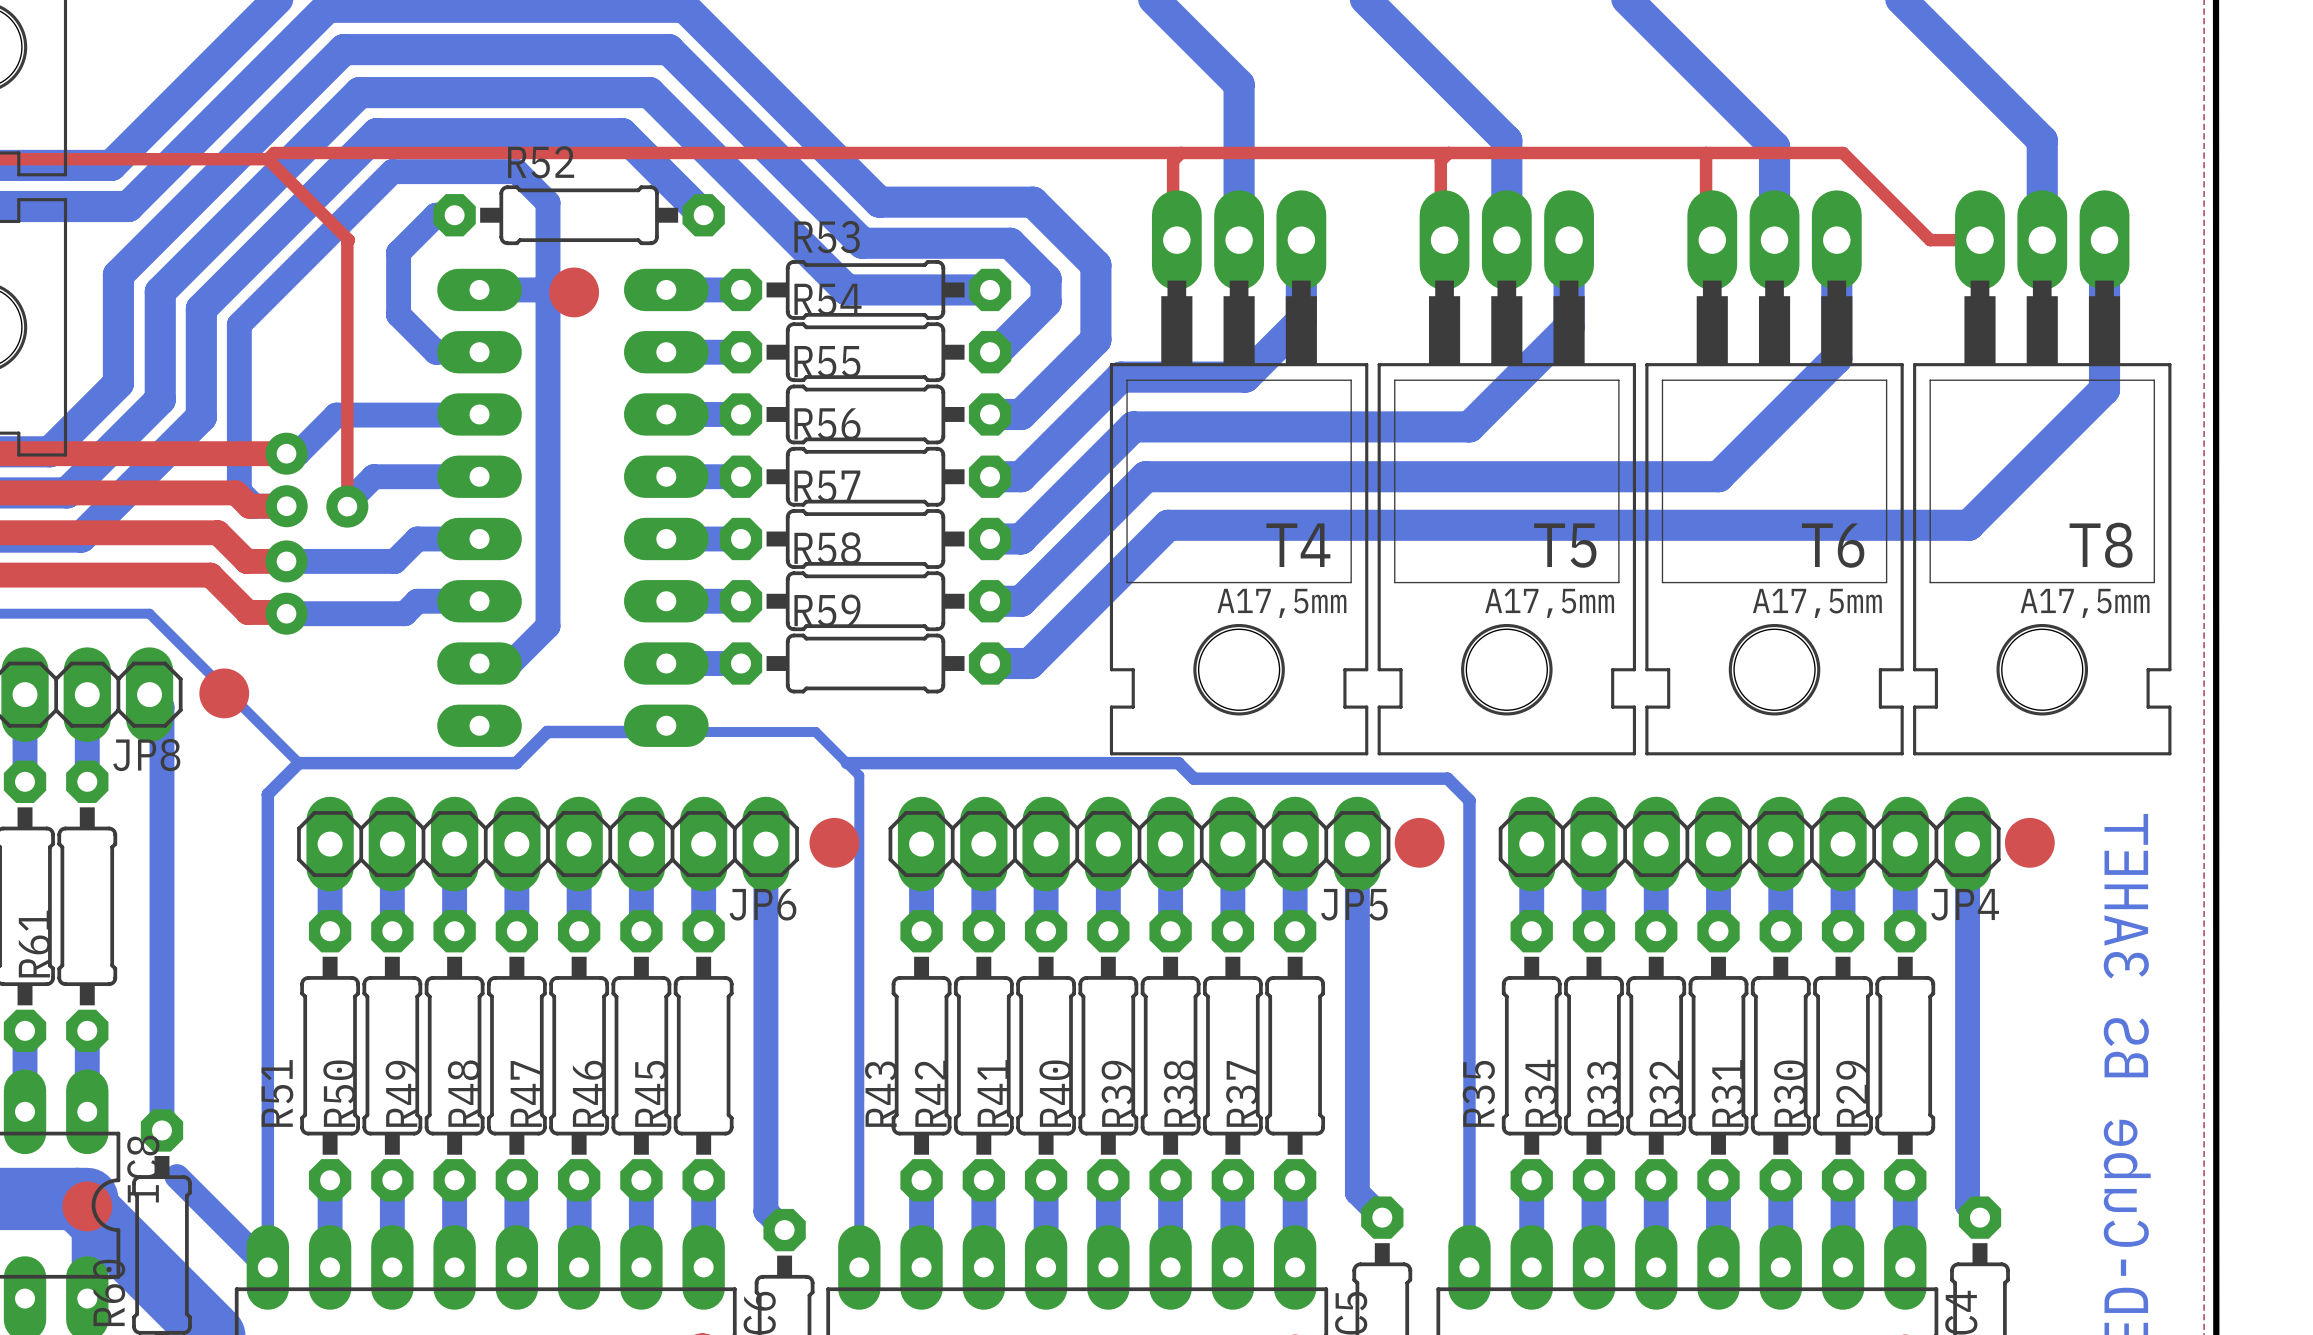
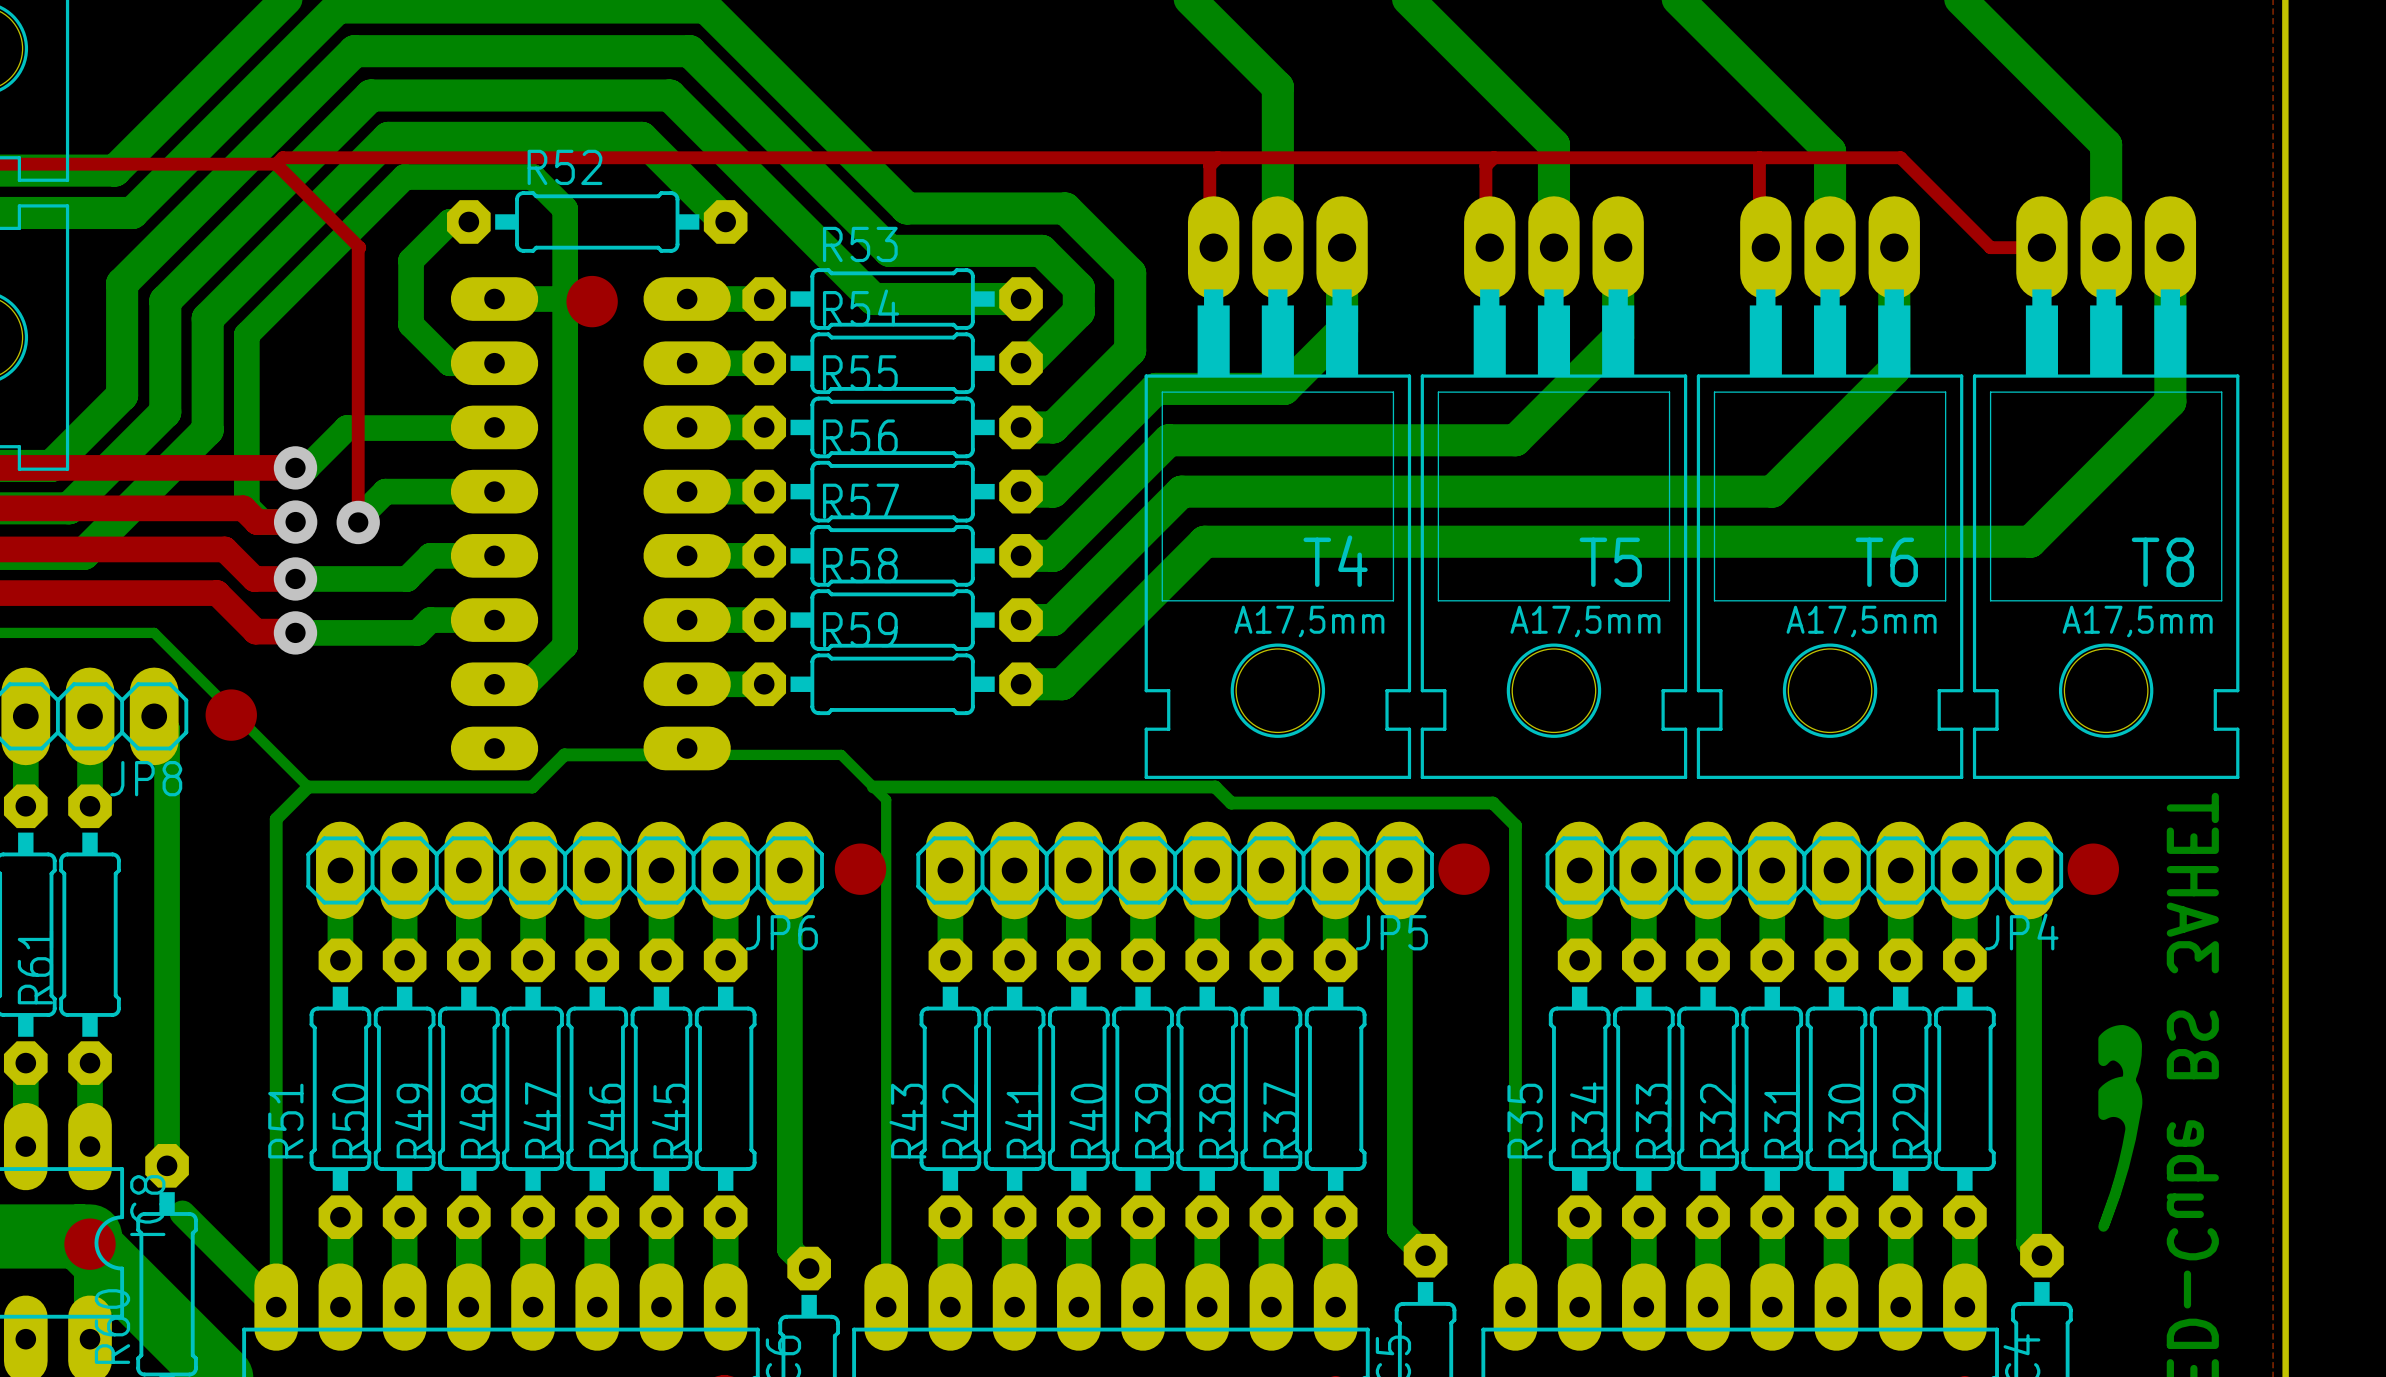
drawing: none -> [2098, 1024, 2143, 1232]

